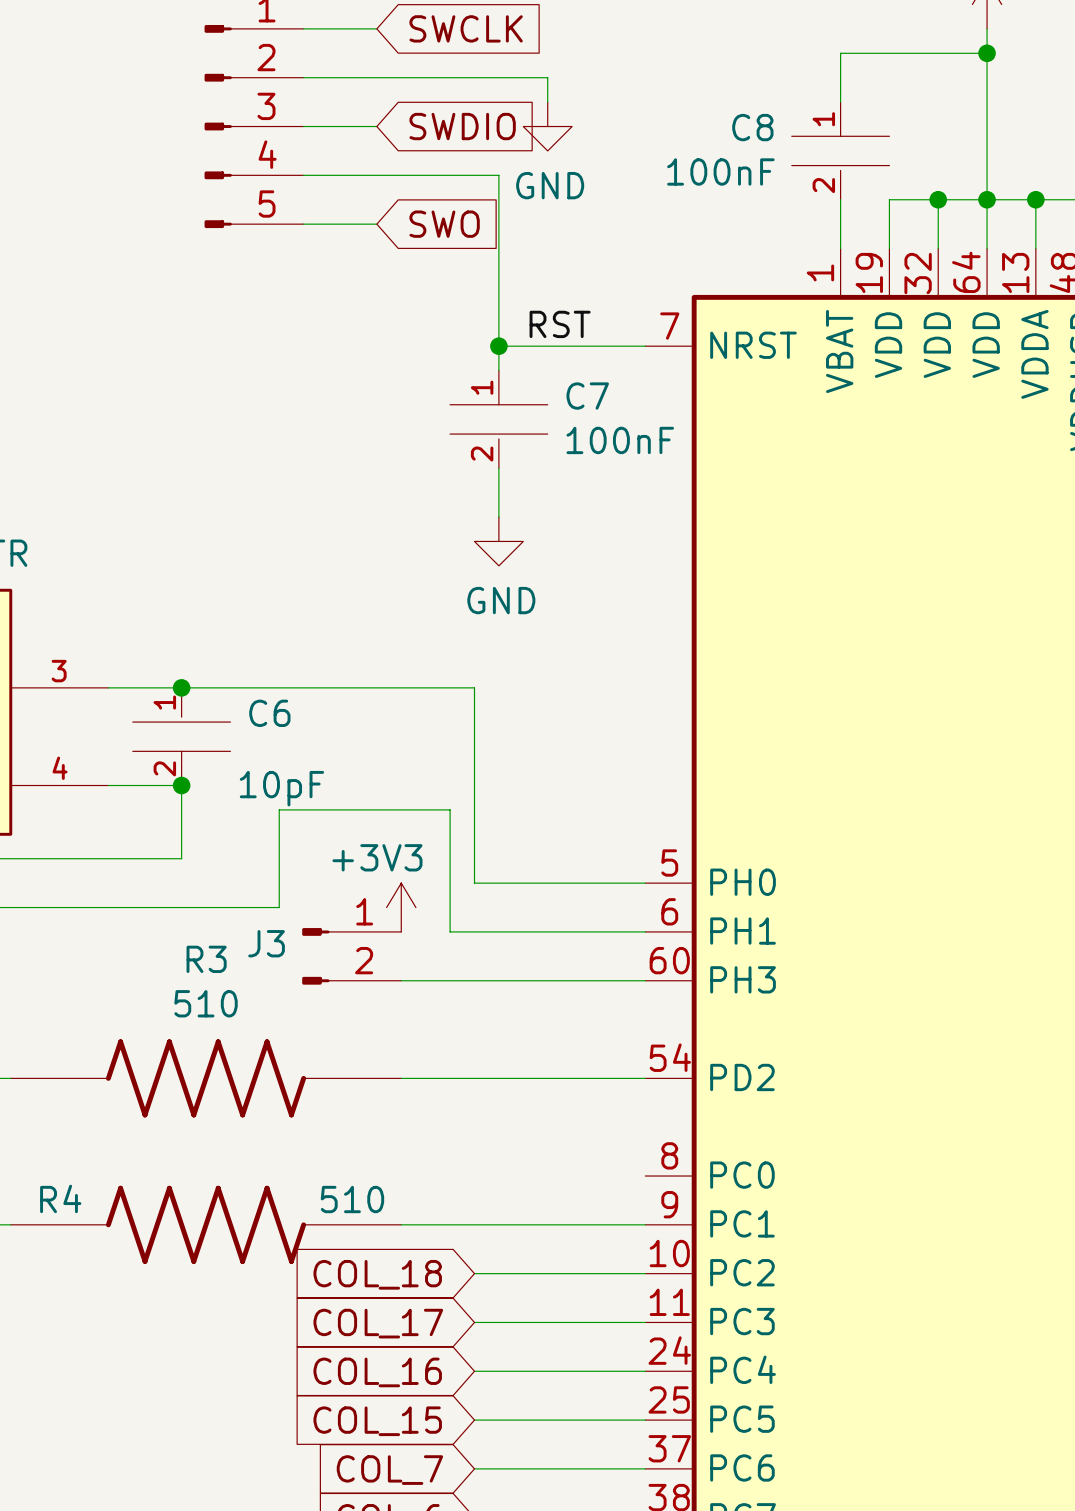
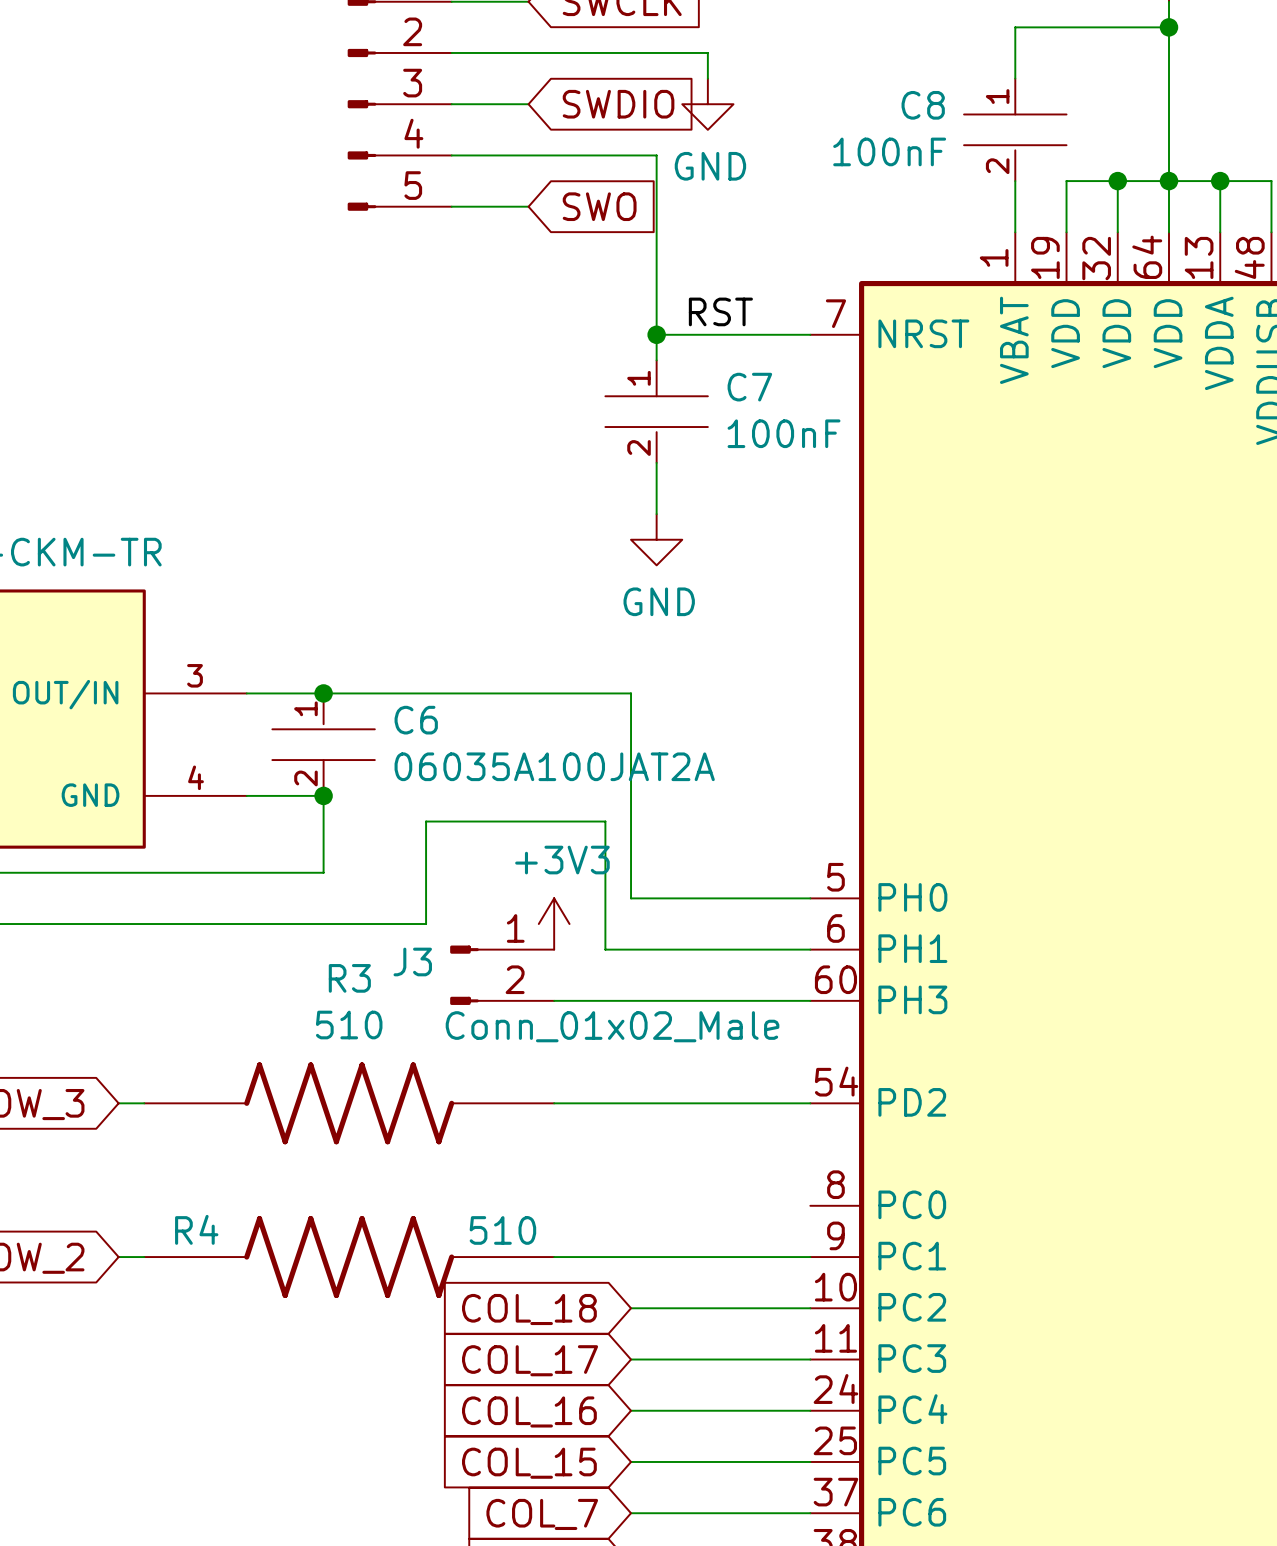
C6 value: none -> 06035A100JAT2A (554, 766)
C6 text: 10pF (281, 788) -> none
power symbol text position: +3V3 (377, 857) -> +3V3 (562, 860)
J3 value: none -> Conn_01x02_Male (612, 1026)

